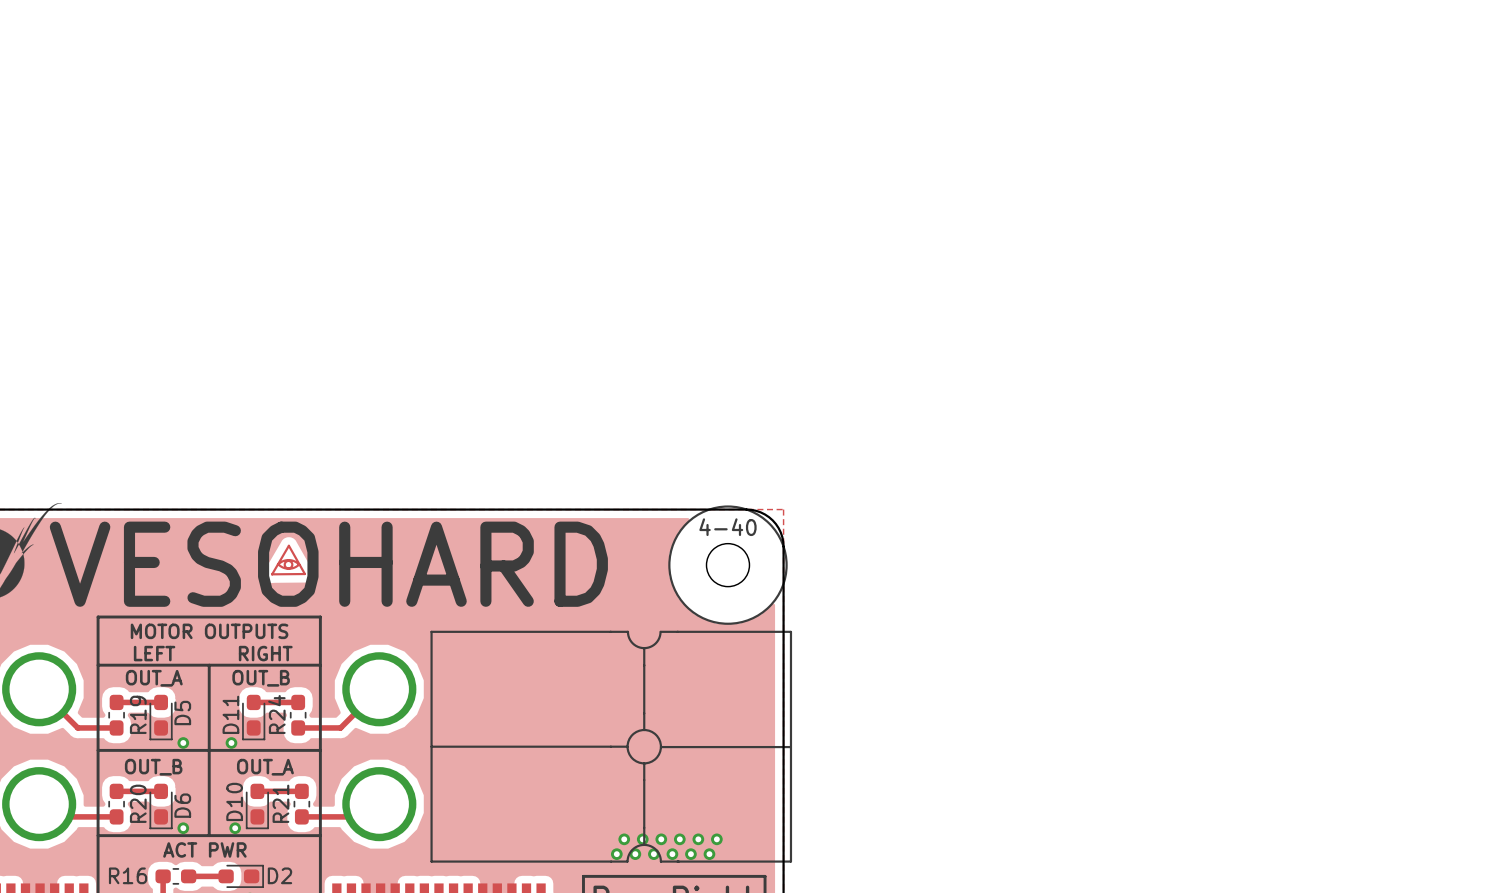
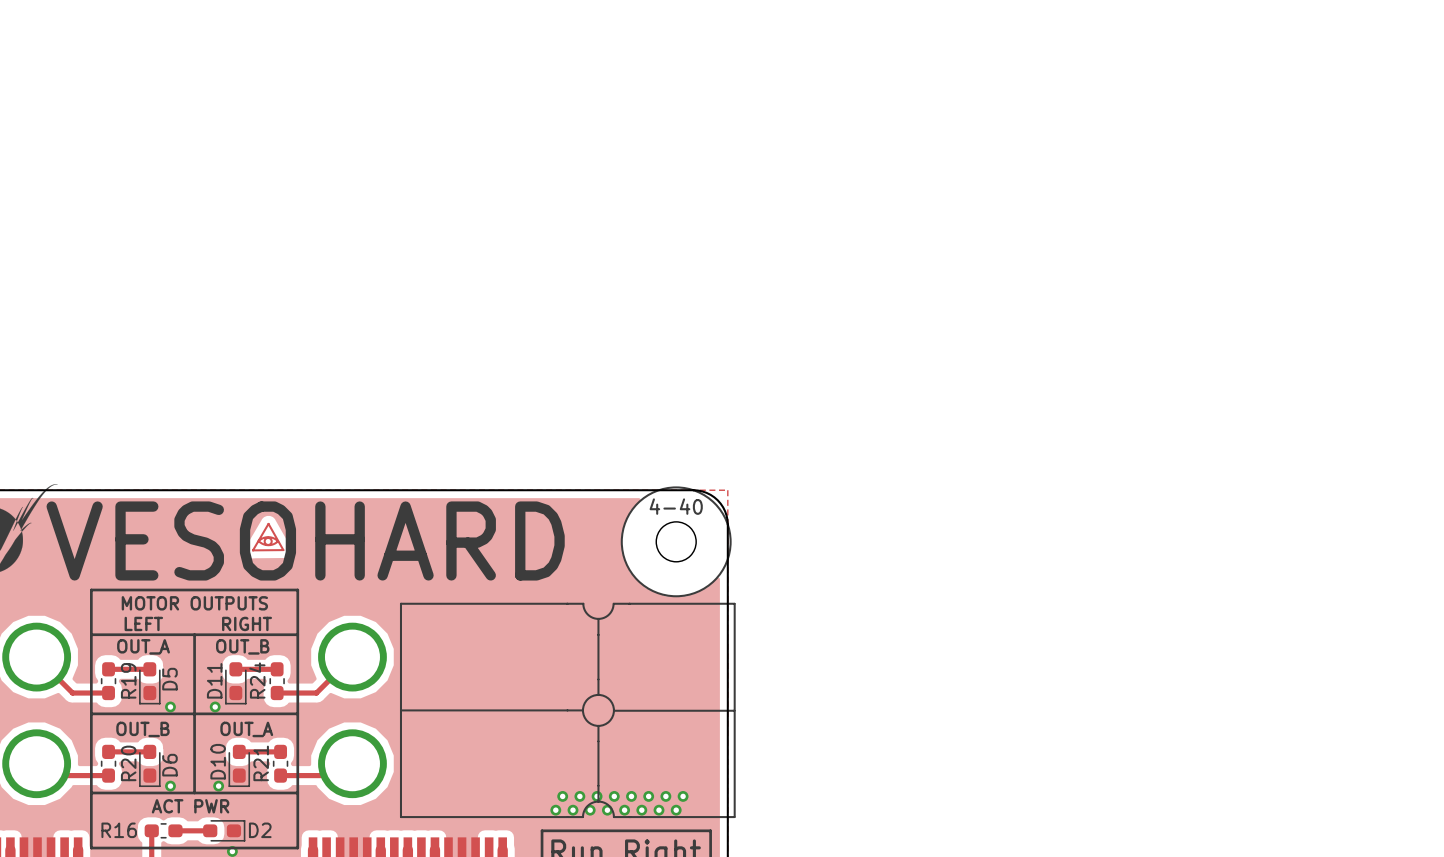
via: none -> (562, 796)
via: none -> (683, 796)
via: none -> (555, 810)
via: none -> (676, 810)

